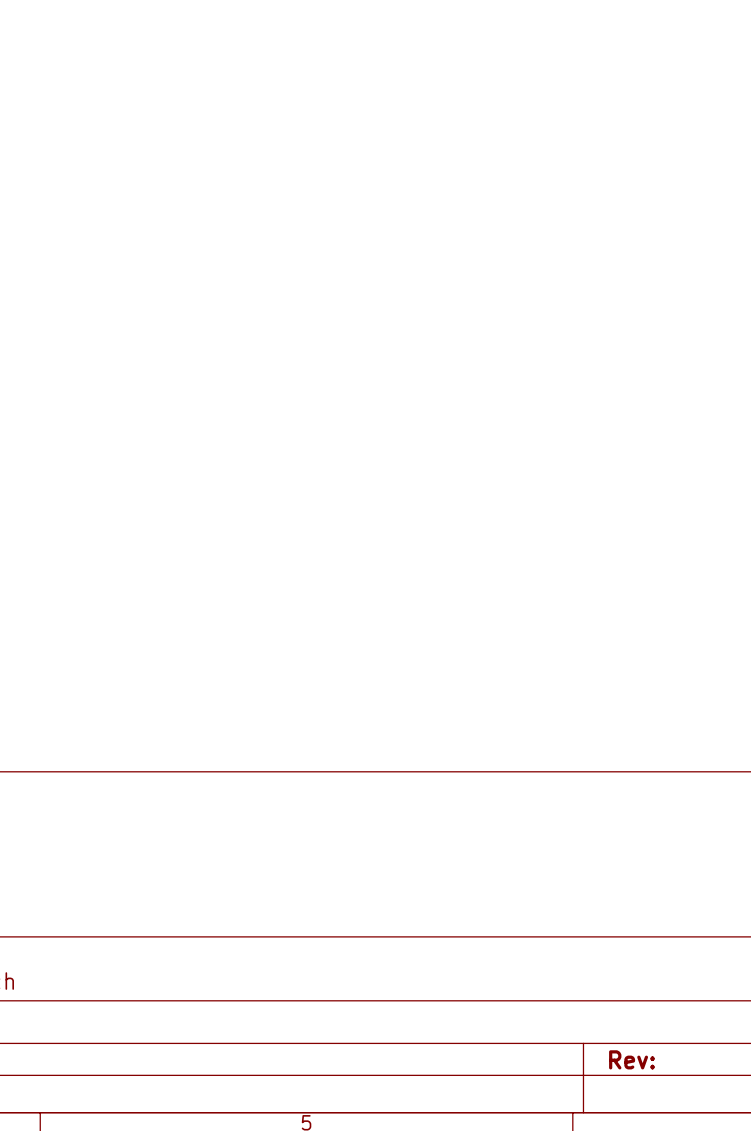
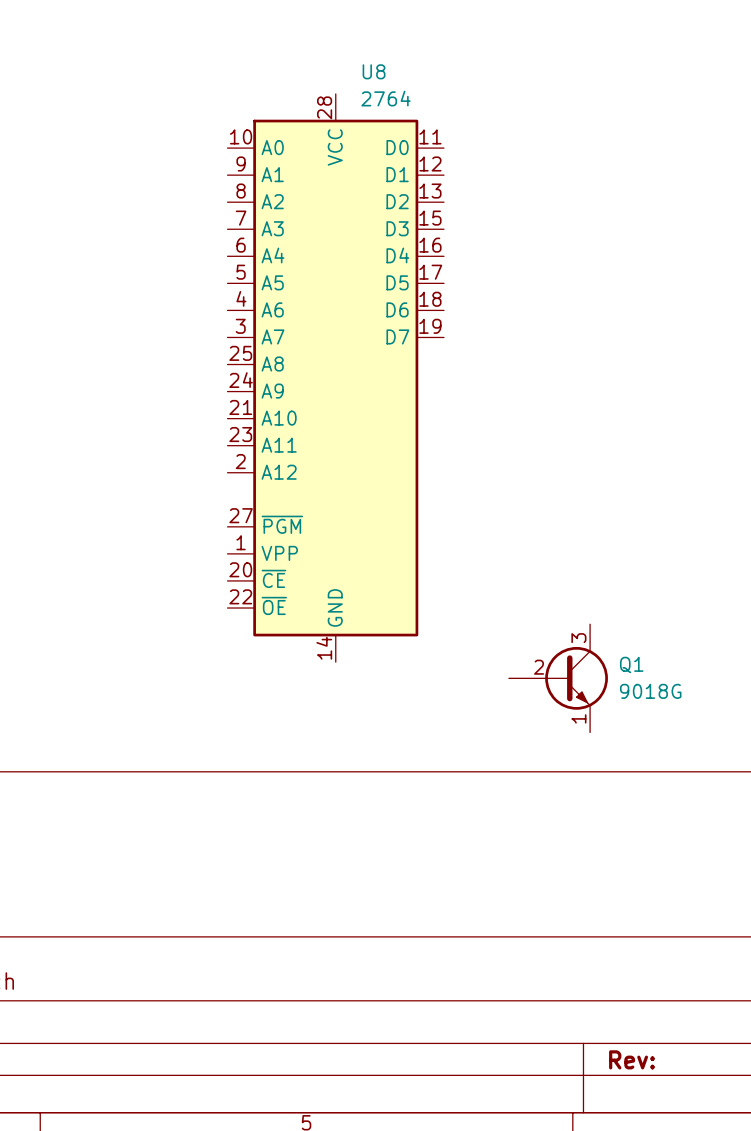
U8: none -> 2764 (335, 378)
Q1: none -> 9018G (558, 678)

